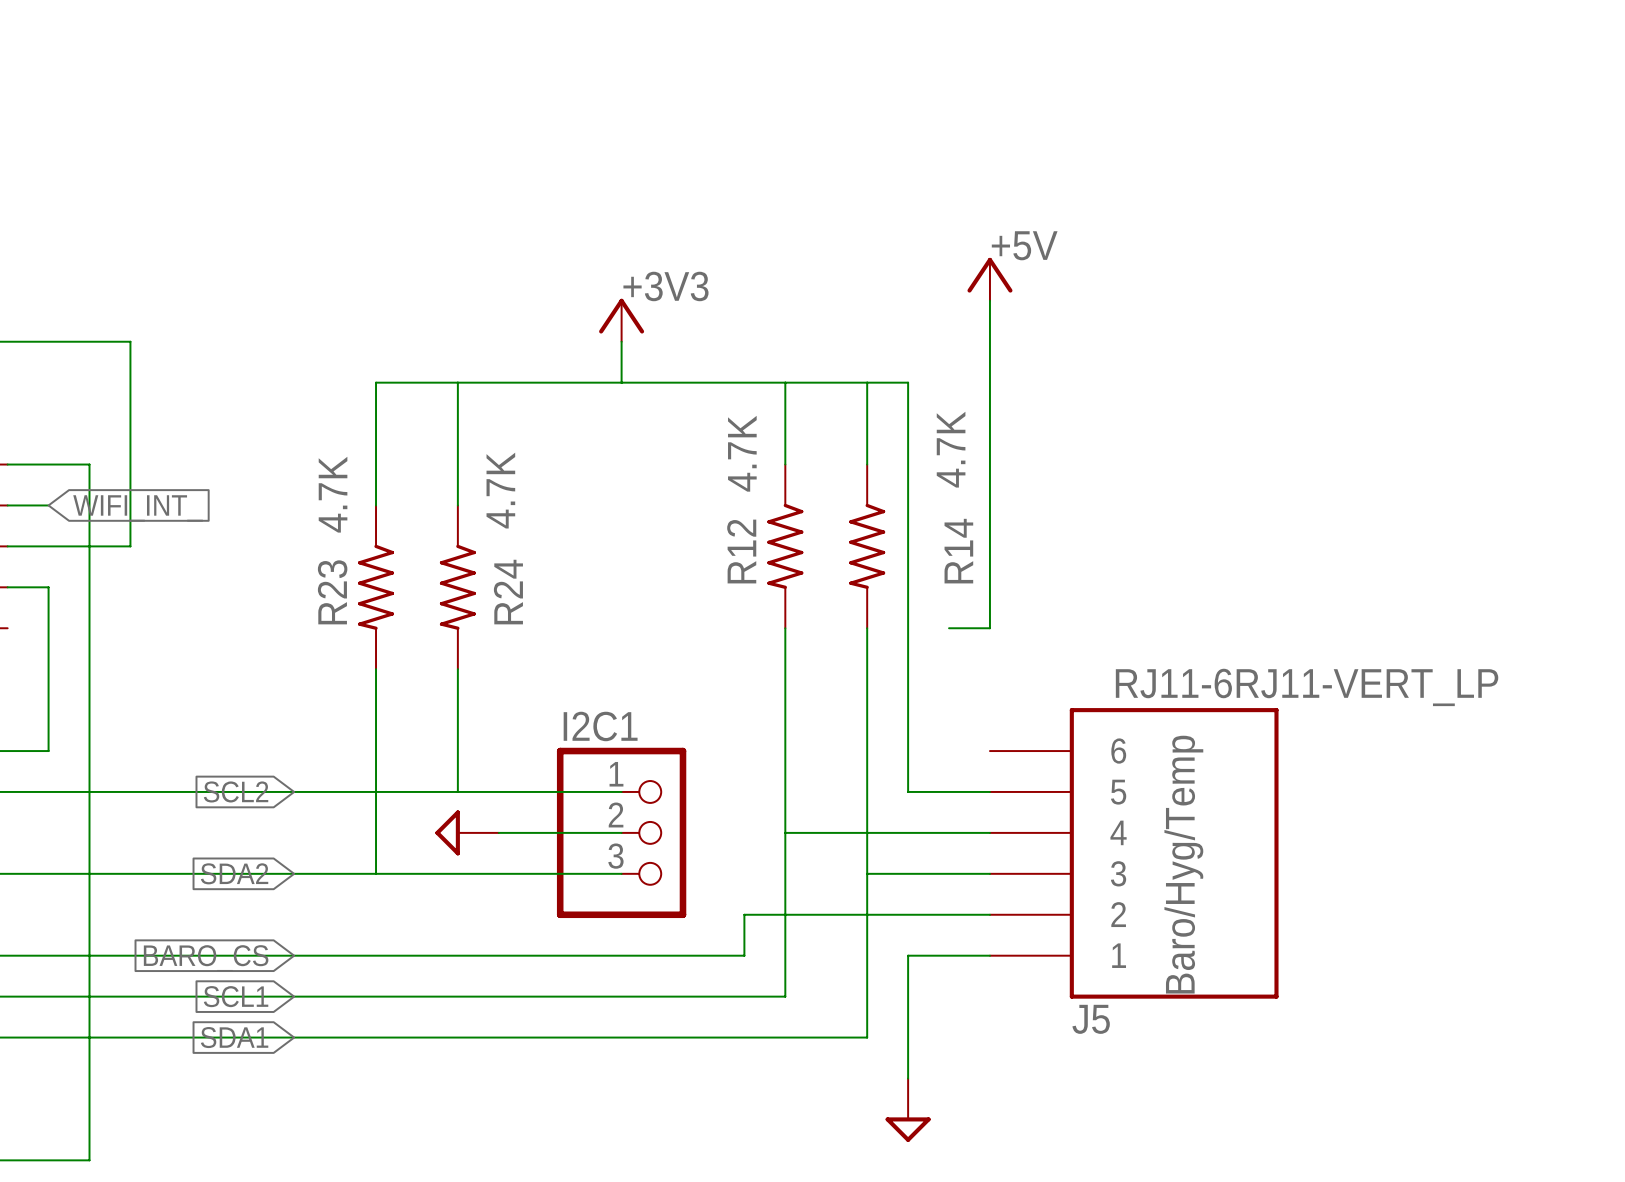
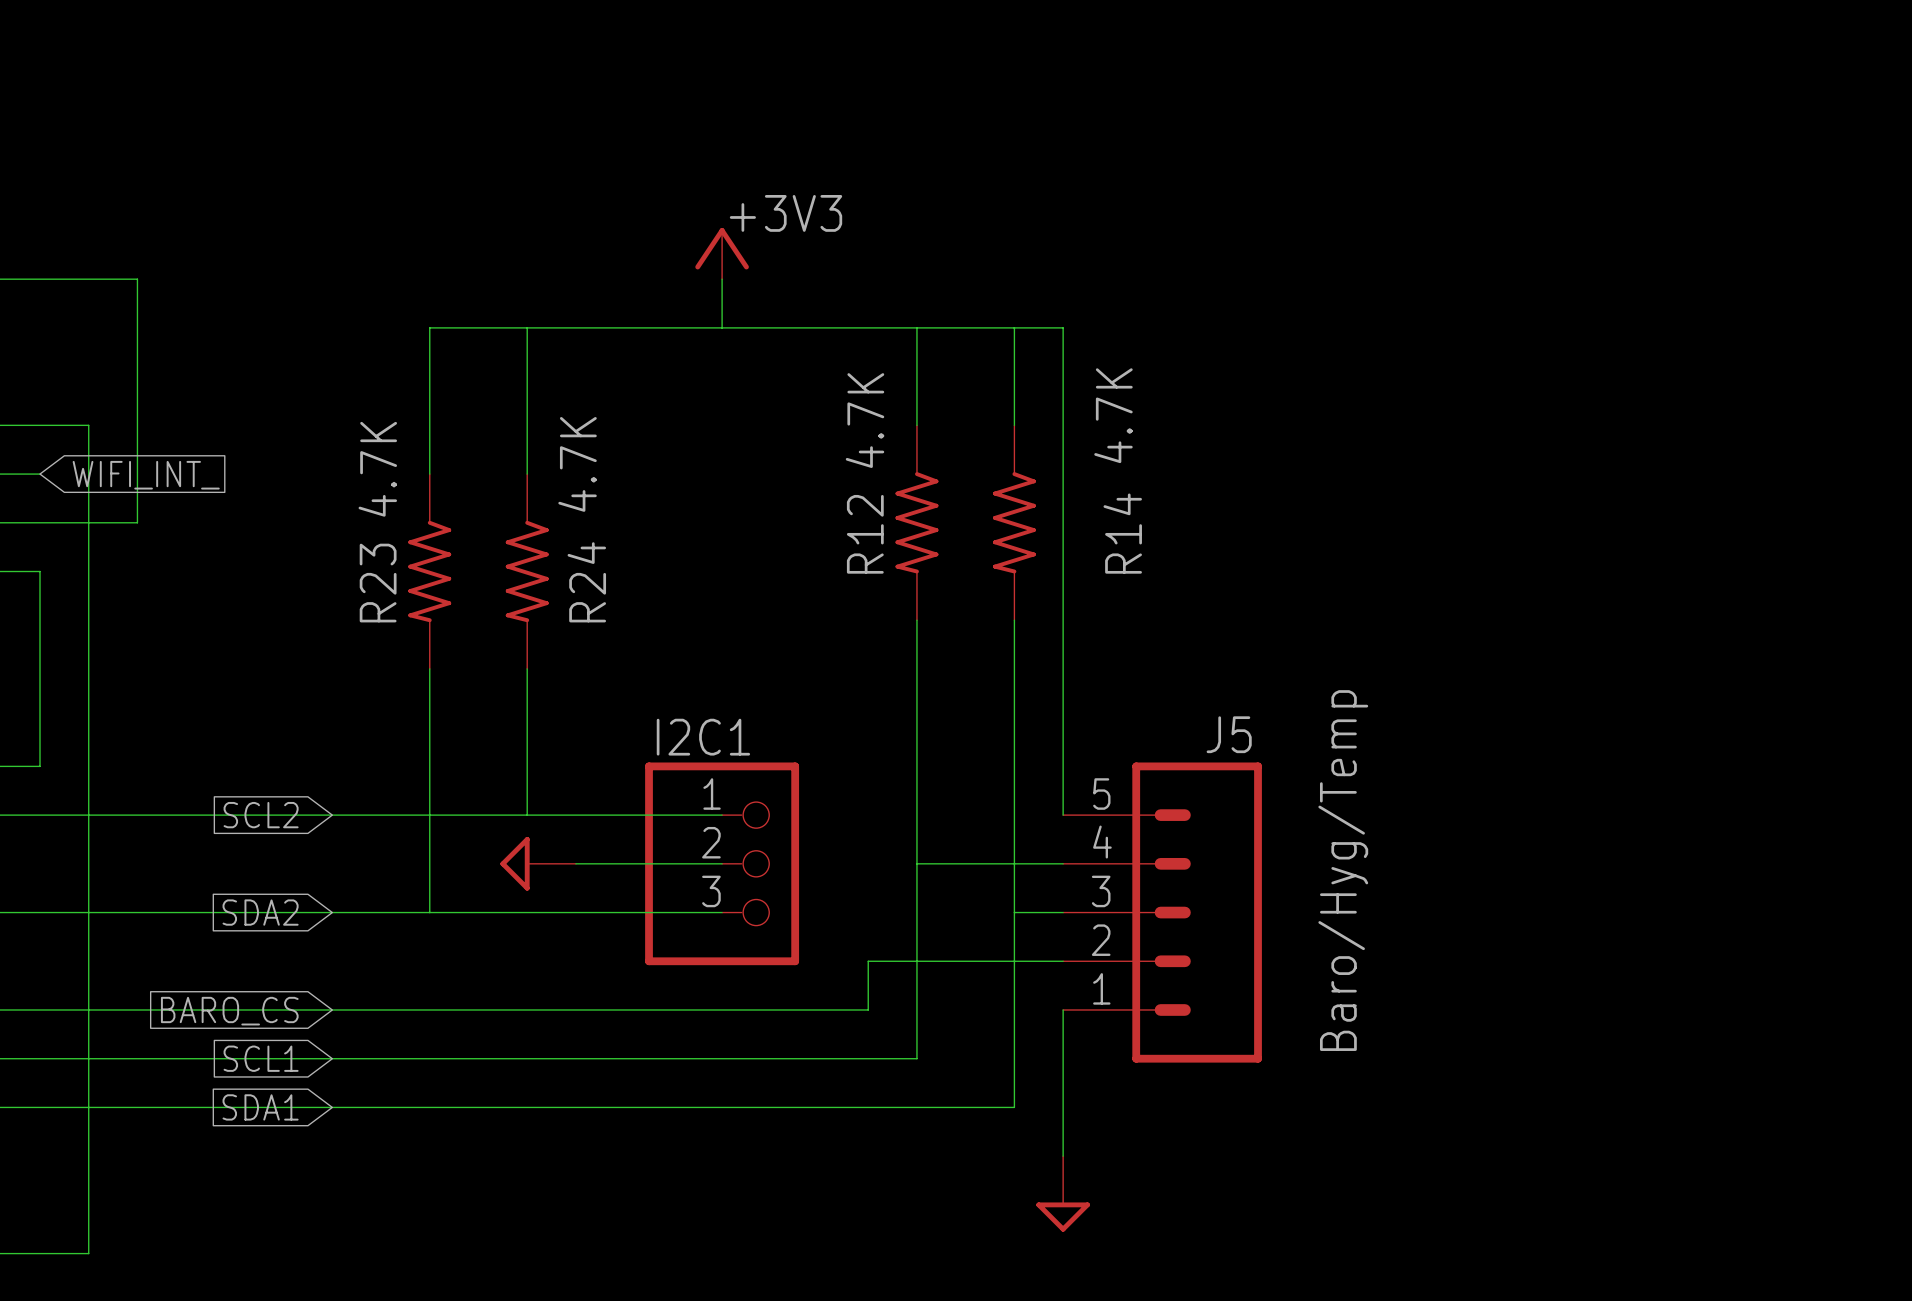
power symbol: +5V (989, 279) -> none
wire: (989, 300) (989, 628) (949, 628) -> none
J5 value: RJ11-6RJ11-VERT_LP (1307, 687) -> none
J5 symbol: [989, 708, 1279, 999] -> [1063, 762, 1262, 1063]
text position: Baro/Hyg/Temp (1183, 864) -> Baro/Hyg/Temp (1343, 870)
J5 name position: J5 (1091, 1019) -> J5 (1229, 734)

